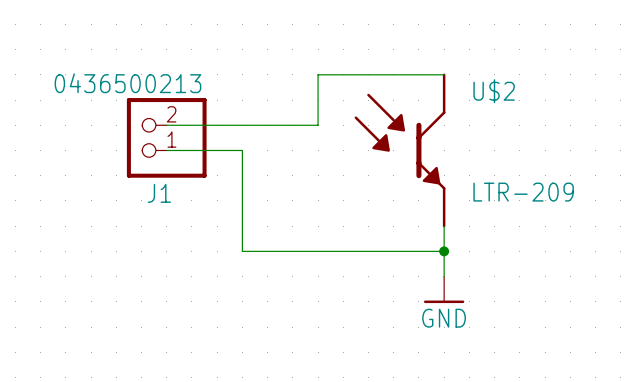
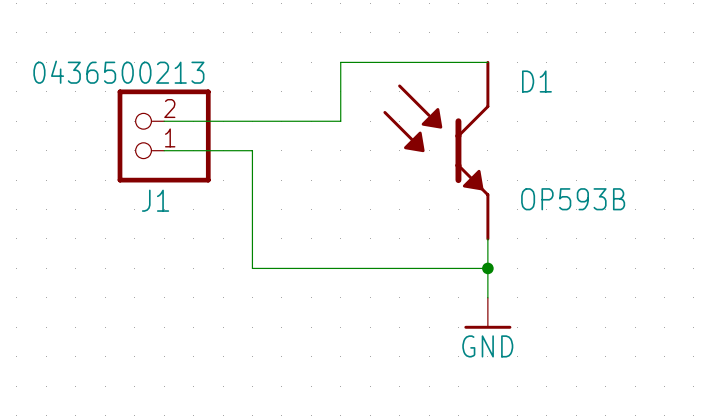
U$2 name: U$2 (494, 91) -> D1 (536, 81)
U$2 value: LTR-209 (523, 192) -> OP593B (573, 199)

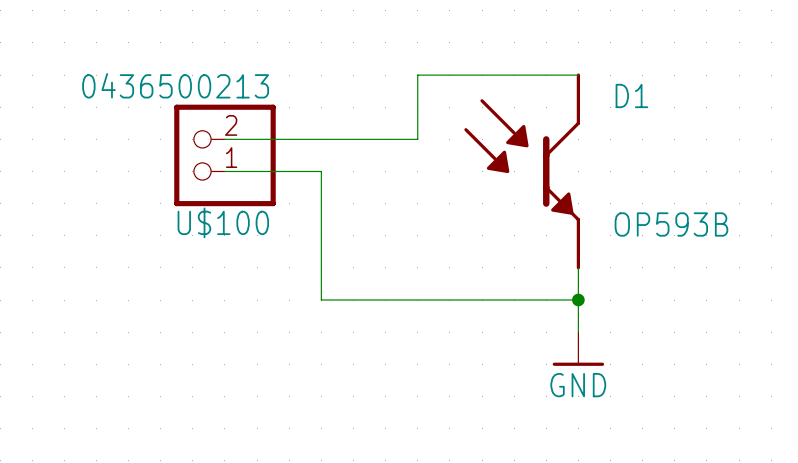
J1 name: J1 (155, 200) -> U$100 (223, 222)

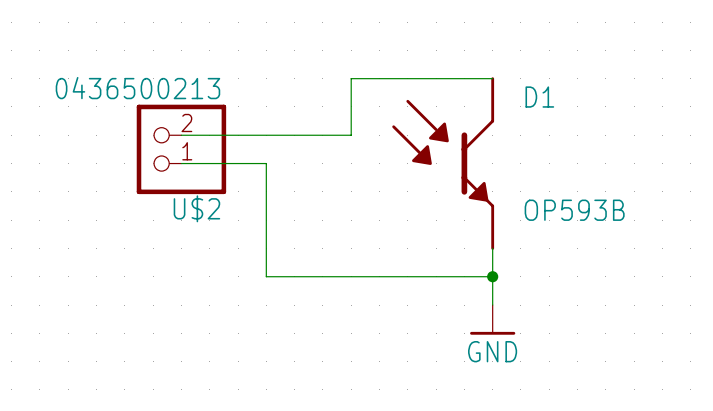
U$100 name: U$100 (223, 222) -> U$2 (196, 208)

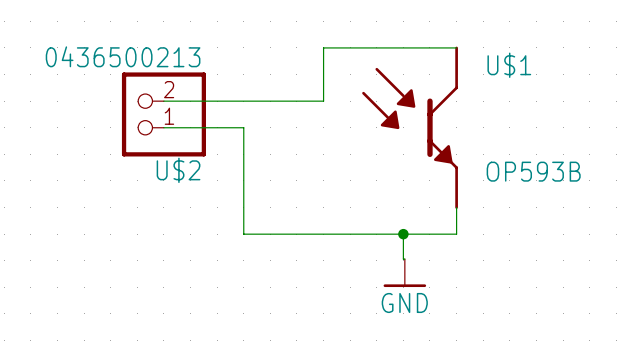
D1 name: D1 (539, 97) -> U$1 (509, 65)
wire: none -> (403, 234) (404, 259)
wire: (492, 276) (492, 305) -> none
junction position: (492, 276) -> (403, 234)
power symbol position: GND (492, 319) -> GND (404, 273)

